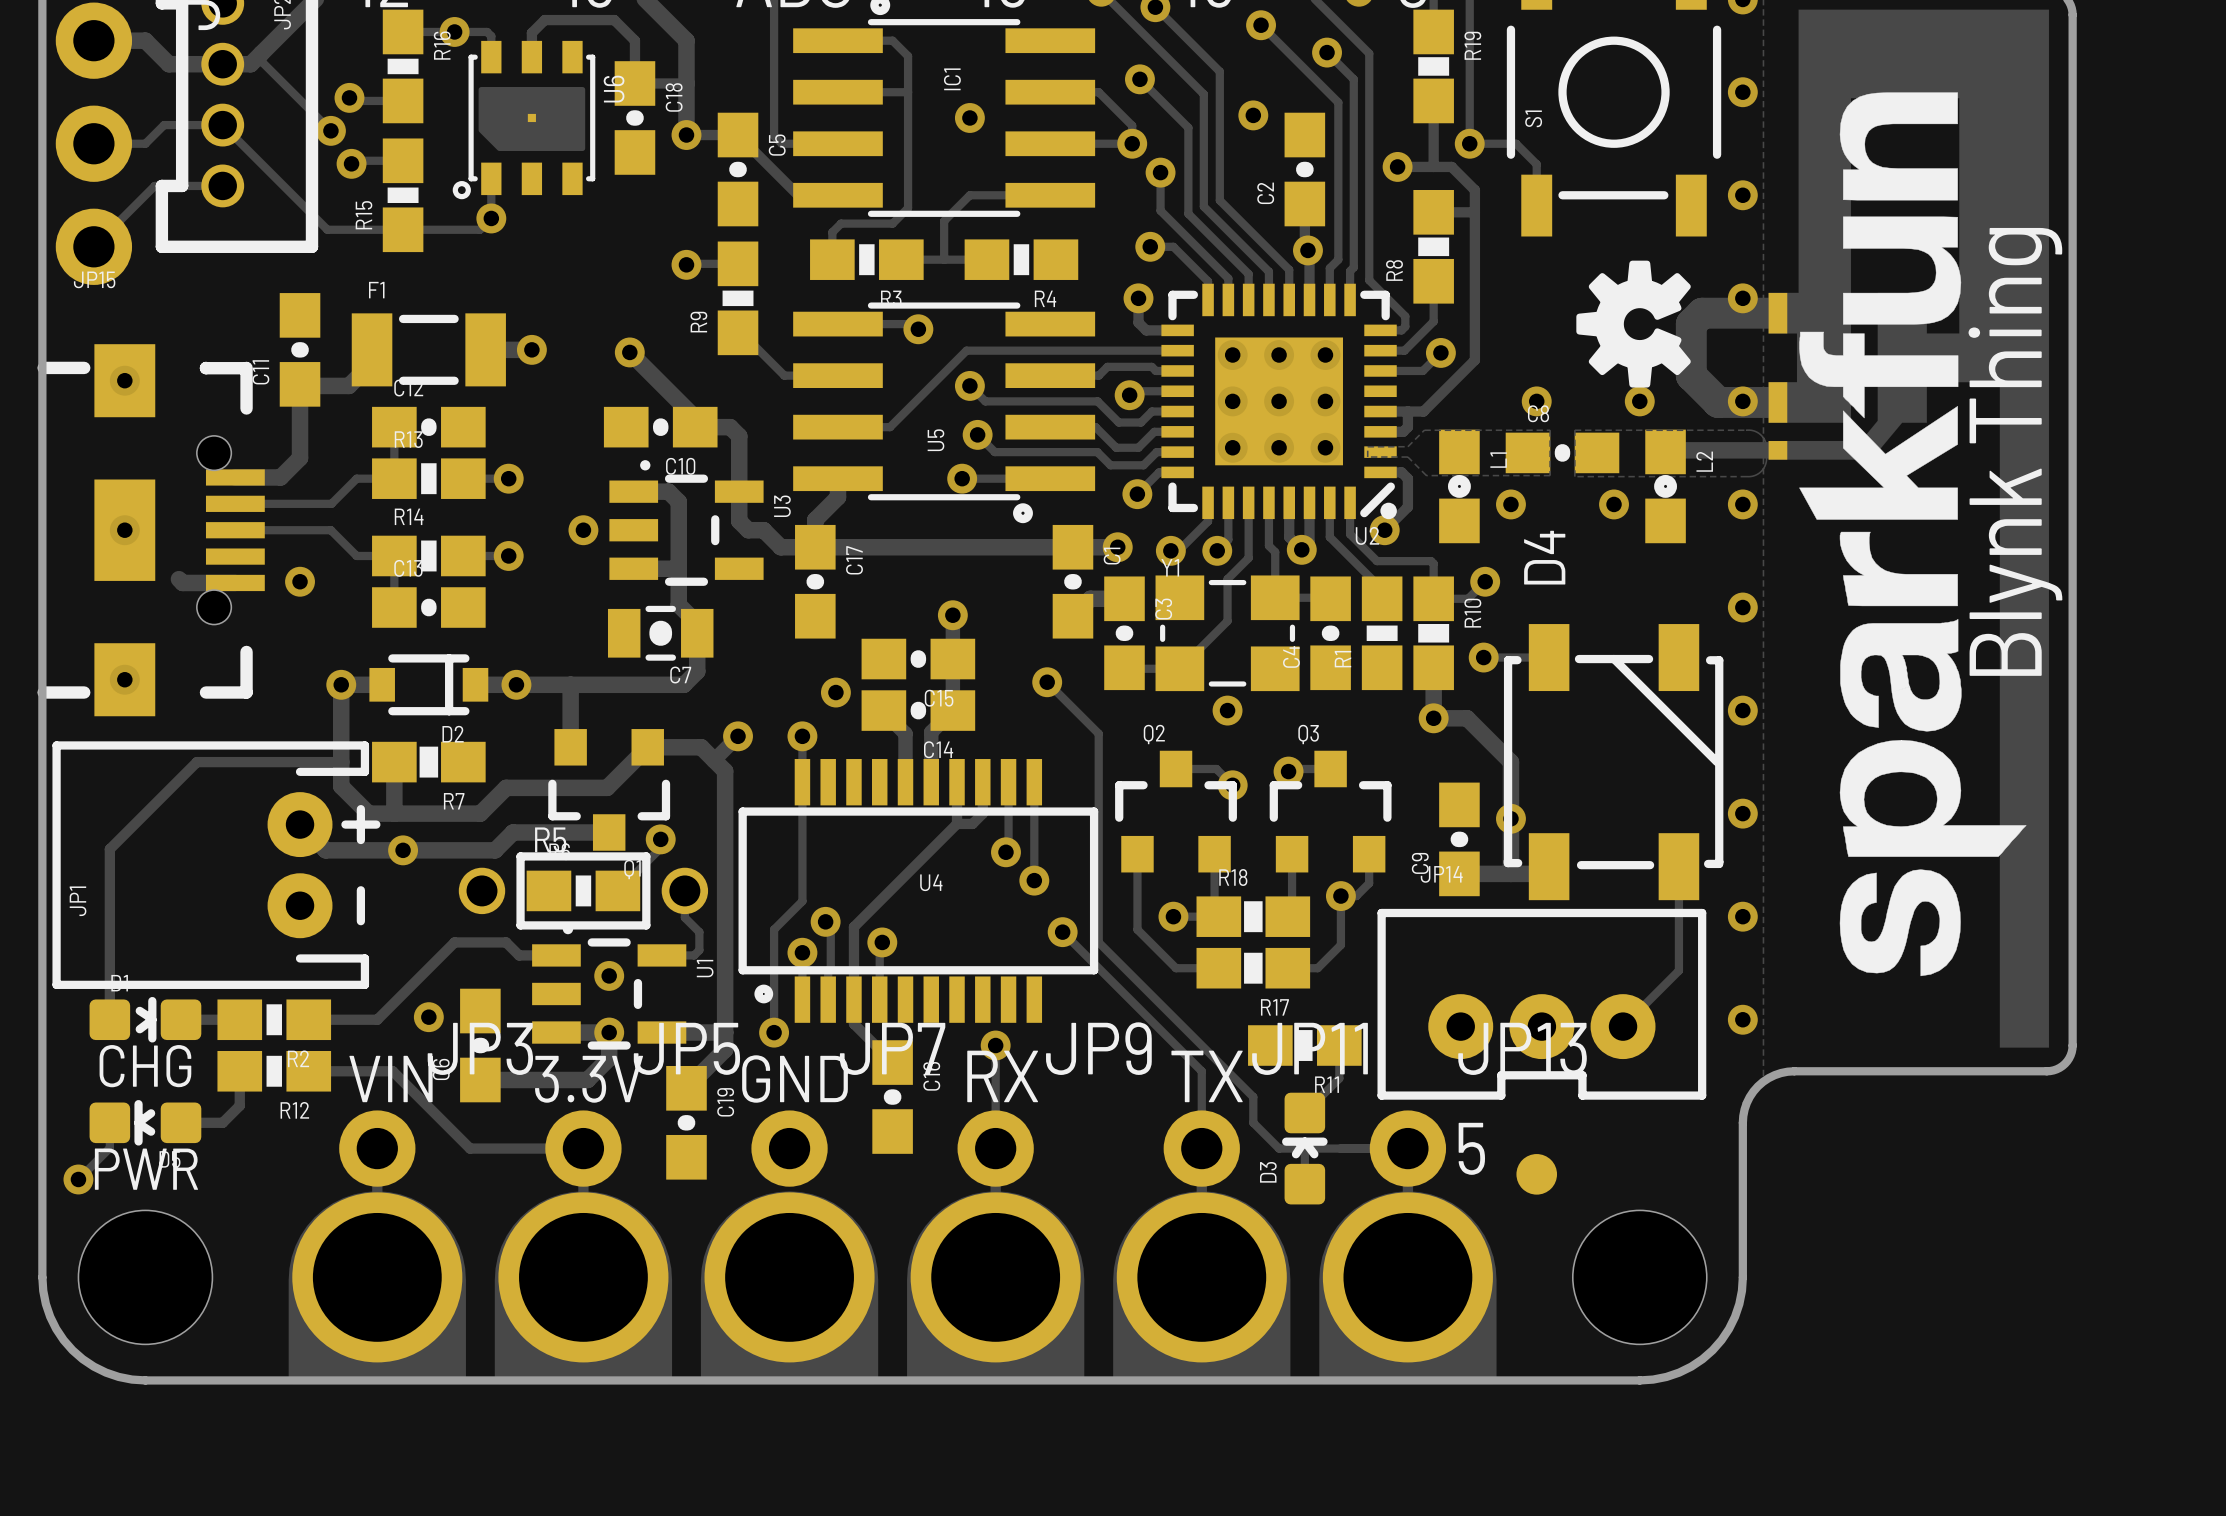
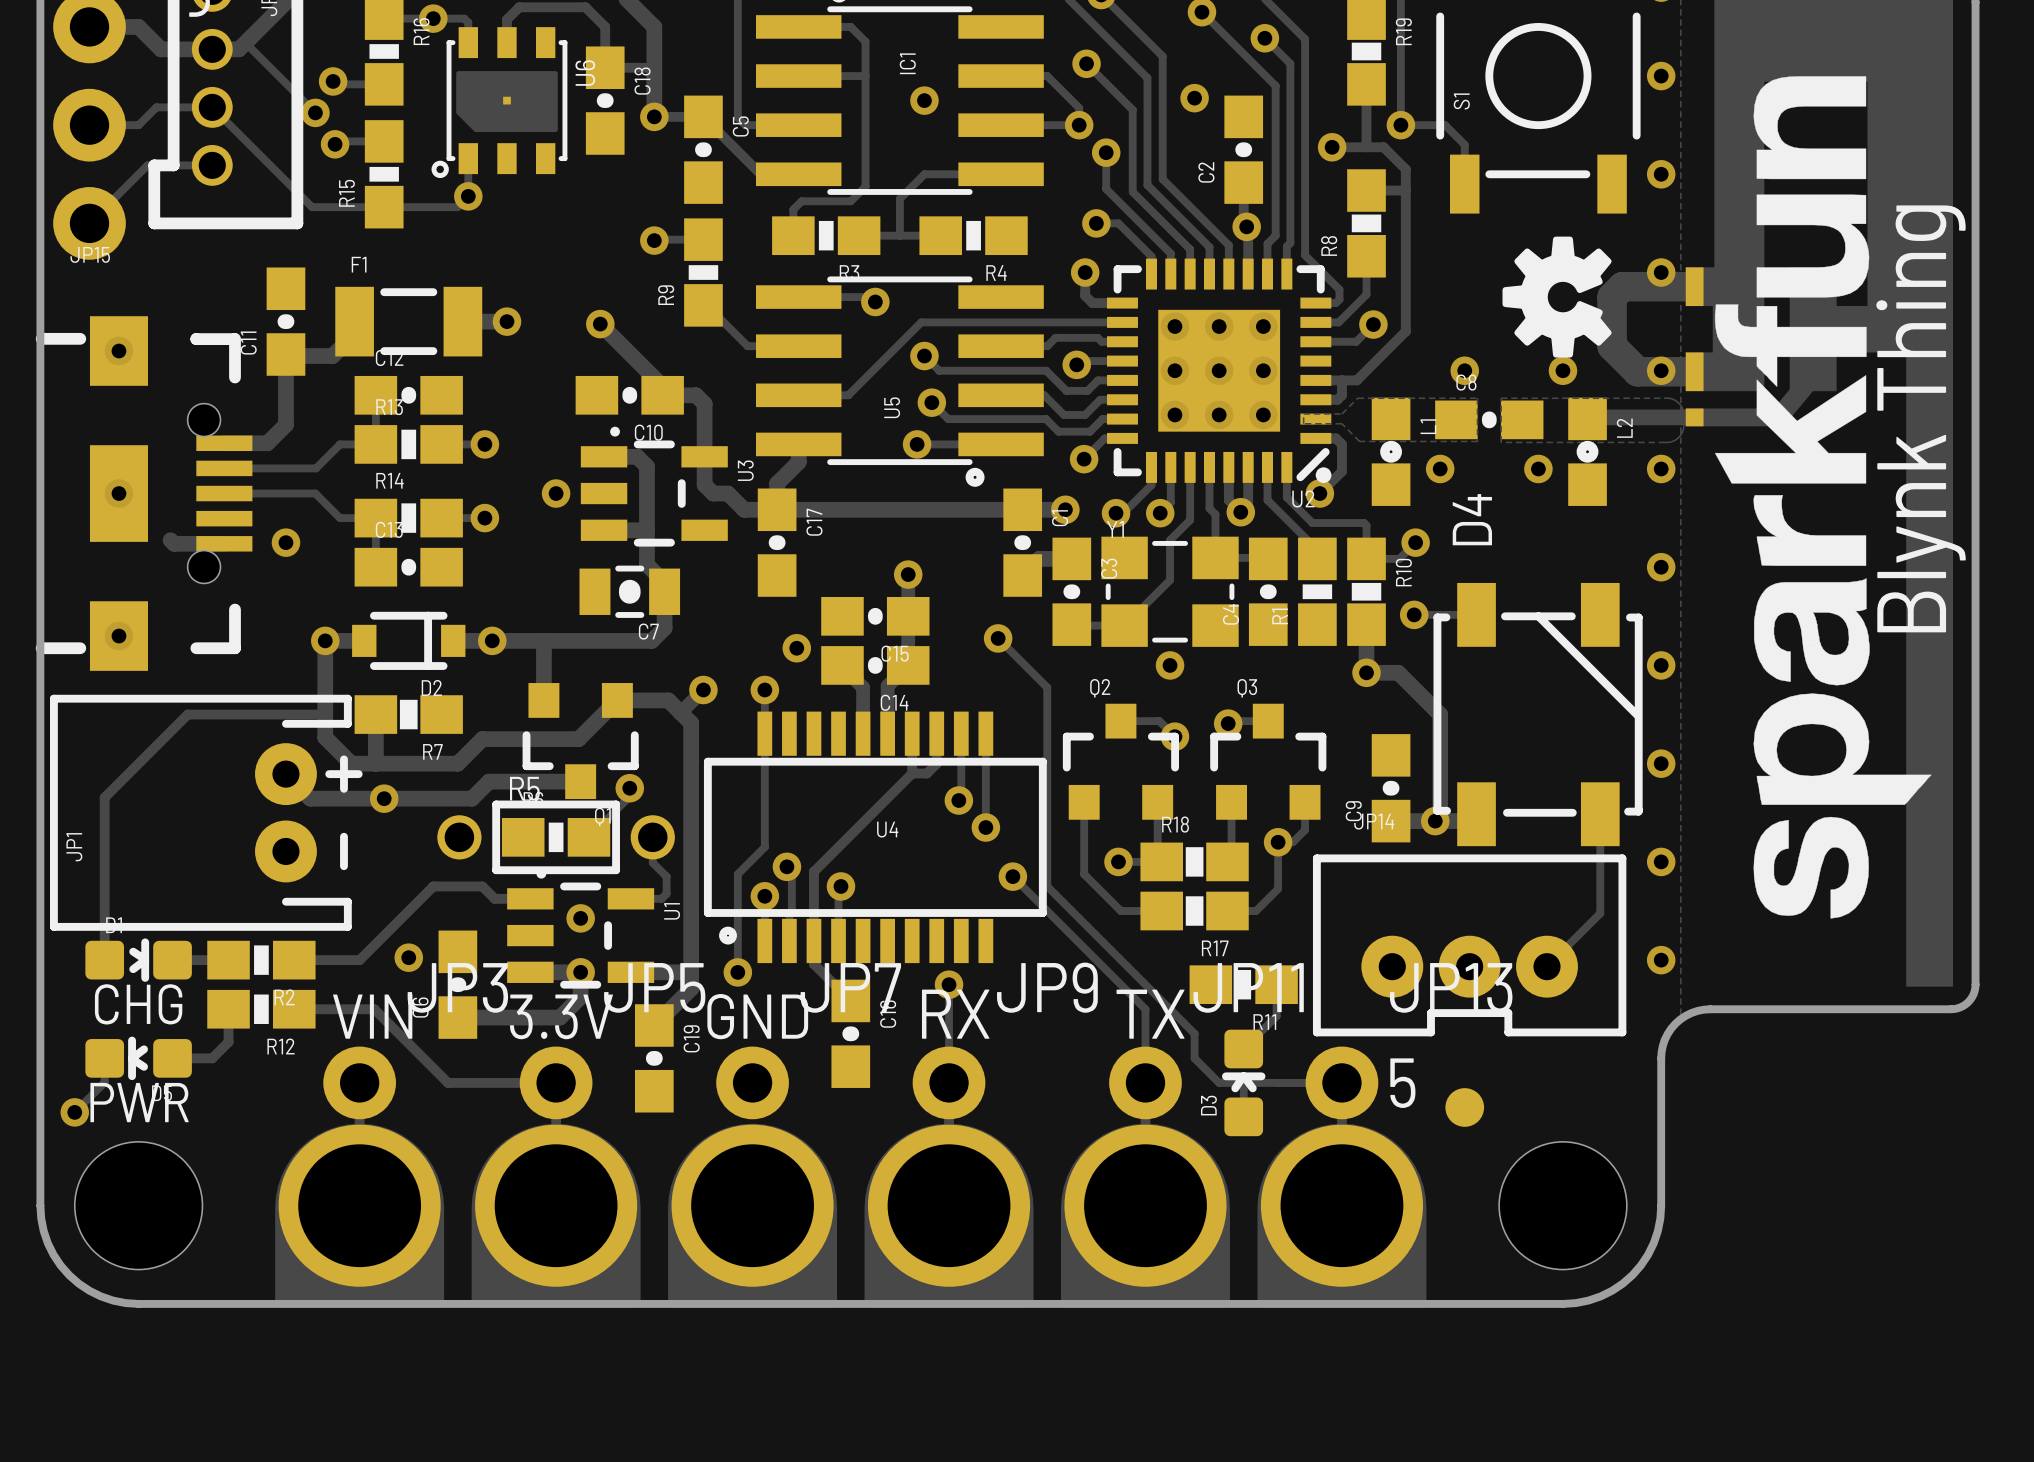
via position: (1510, 818) -> (1435, 821)

